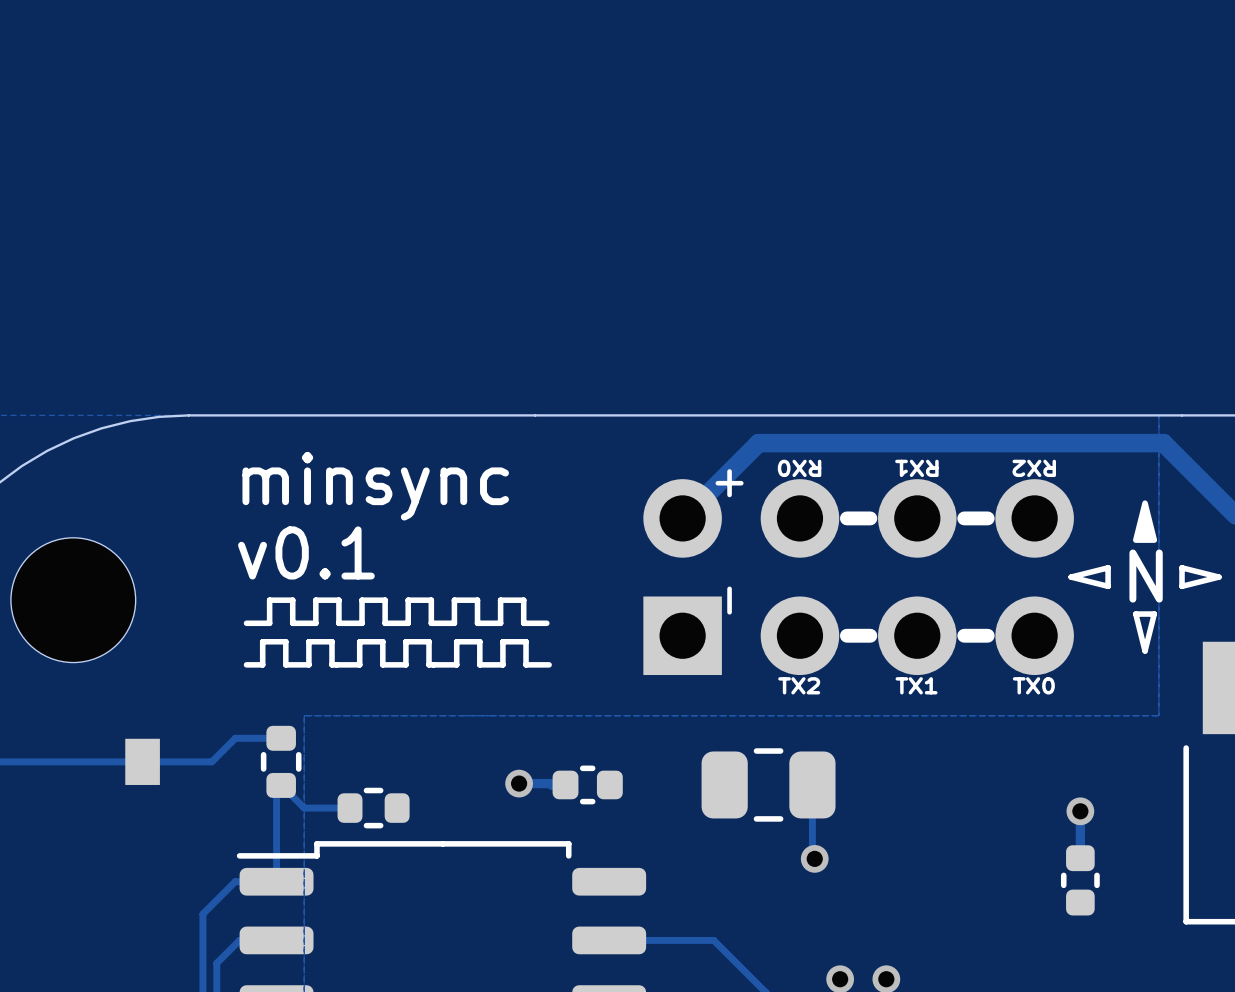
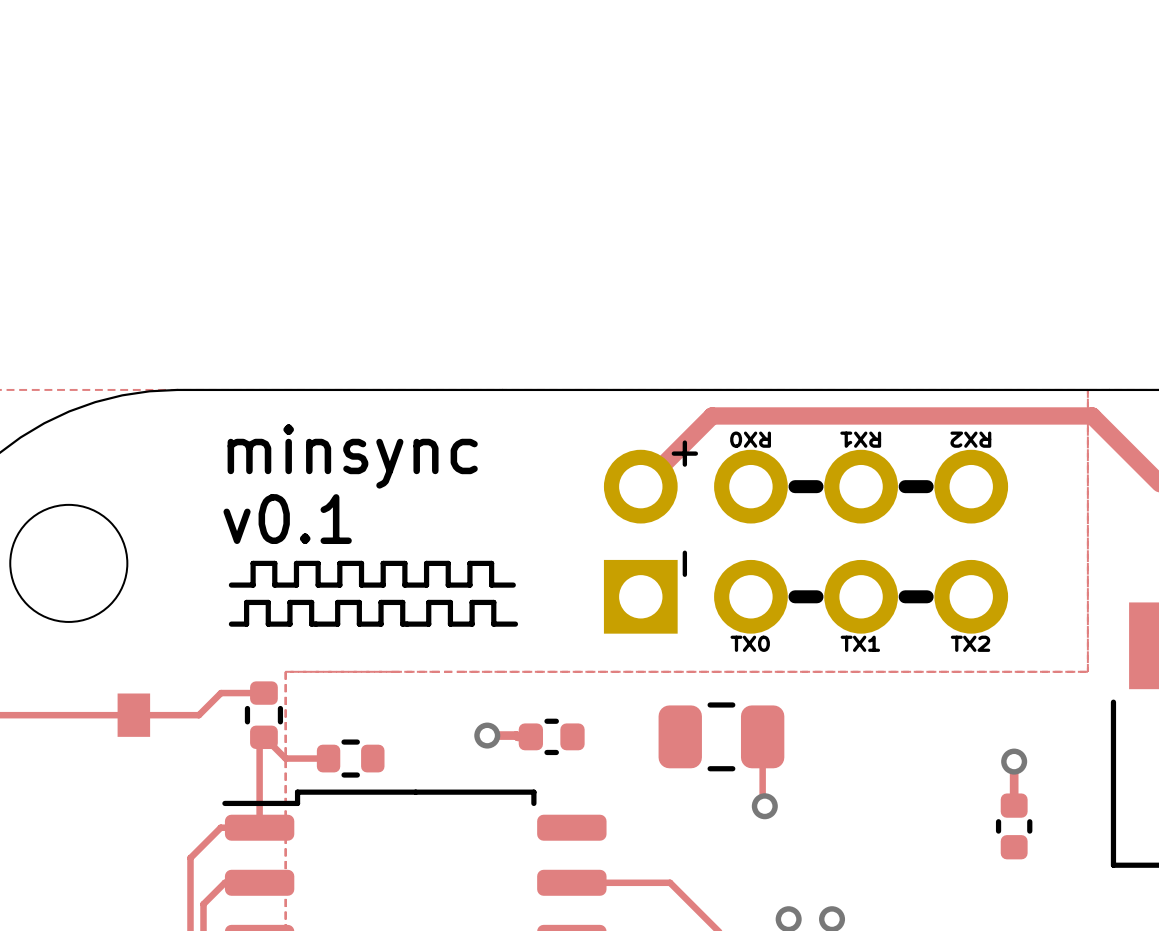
drawing: [1133, 500, 1158, 543] -> none
line: (1108, 567) (1108, 586) (1071, 577) (1108, 567) -> none
line: (1182, 567) (1182, 586) (1218, 577) (1182, 567) -> none
text: N (1146, 576) -> none
line: (1135, 614) (1154, 614) (1145, 651) (1135, 614) -> none
part text: TX2 (799, 685) -> TX0 (750, 643)
part text: TX0 (1033, 685) -> TX2 (970, 643)

